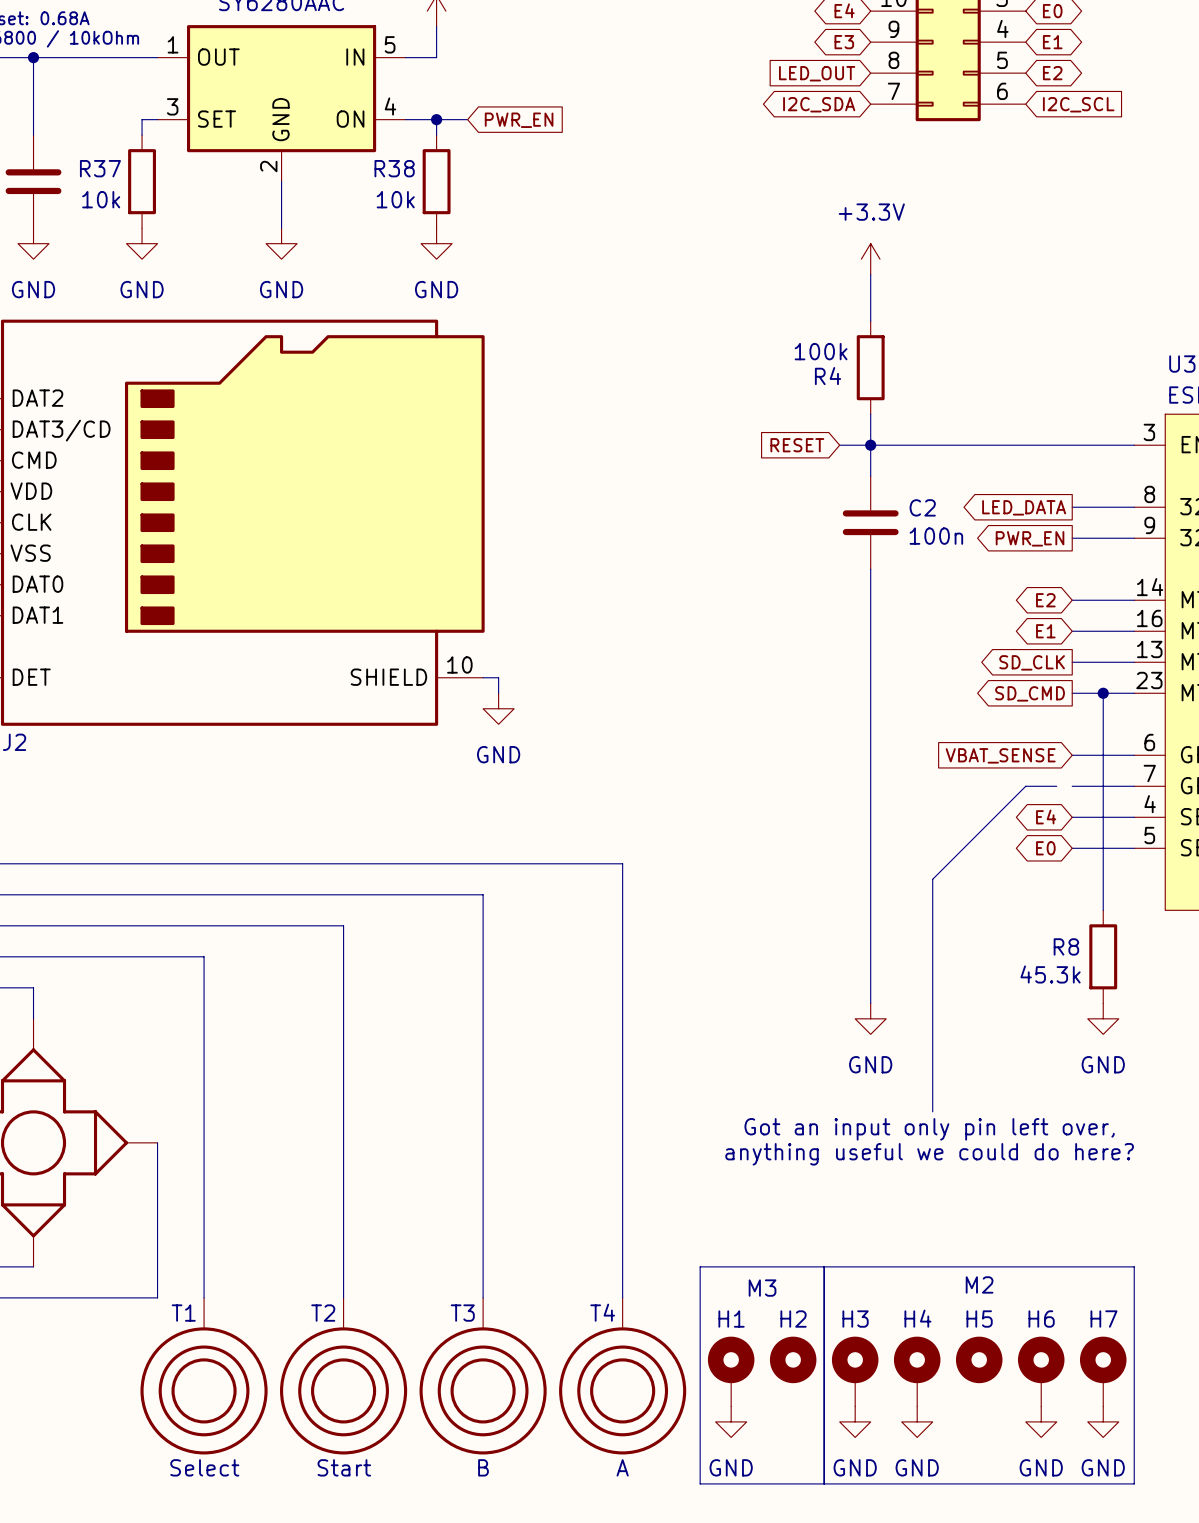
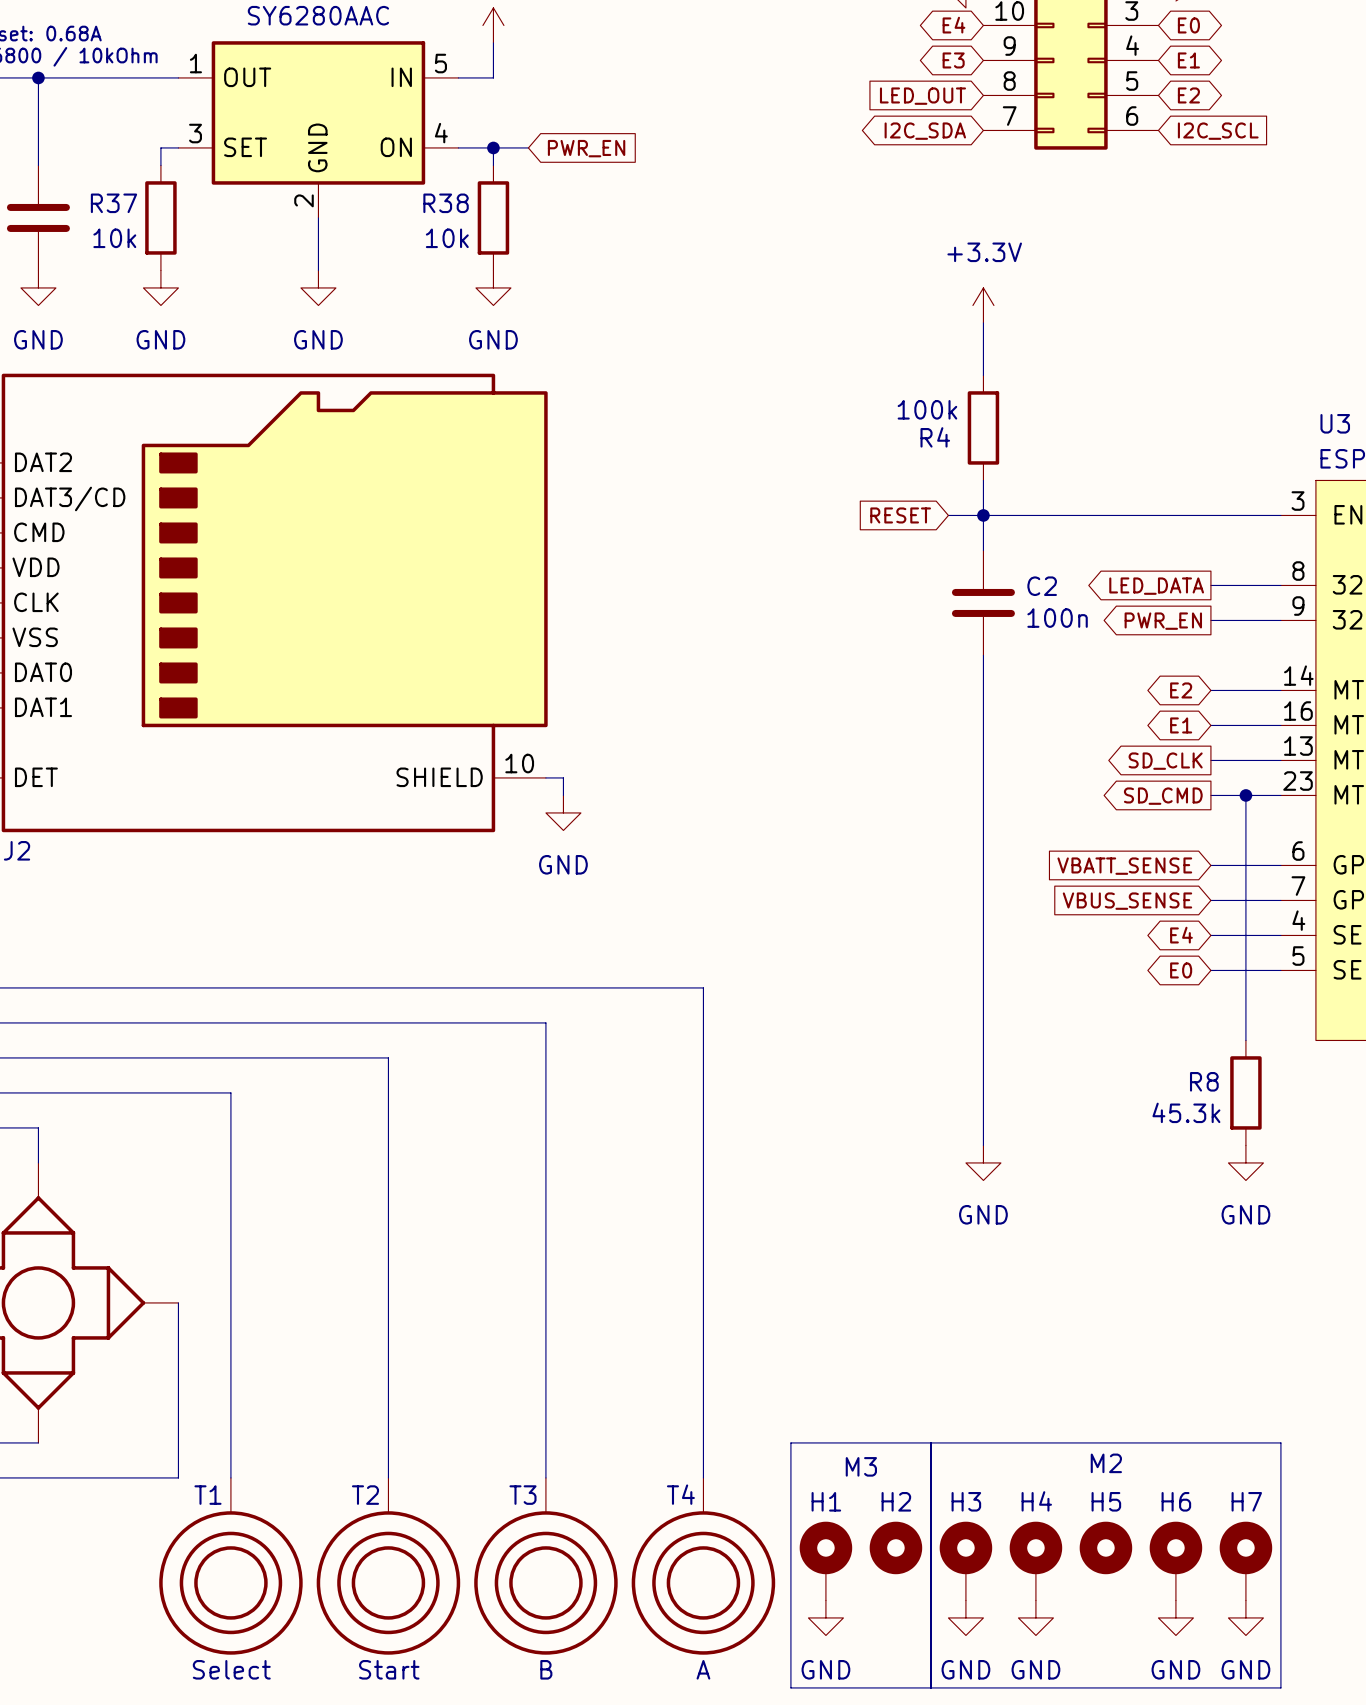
global label: VBAT_SENSE (1000, 755) -> VBATT_SENSE (1124, 866)
global label: none -> VBUS_SENSE (1127, 901)
line: (1056, 786) (1025, 786) (932, 879) (932, 1111) -> none
text: Got an input only pin left over, (929, 1129) -> none
text: anything useful we could do here? (929, 1154) -> none

